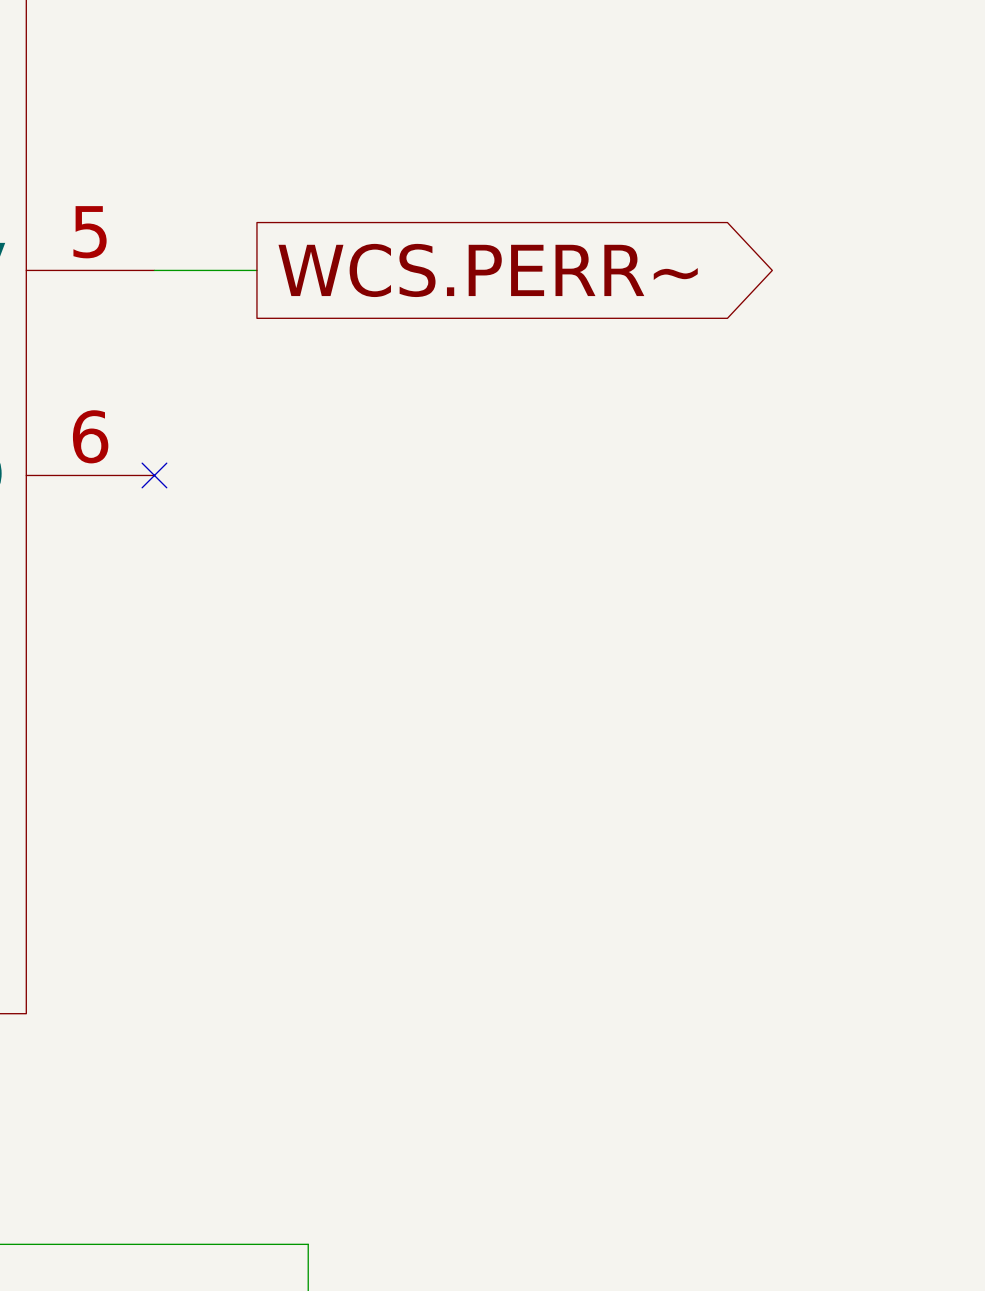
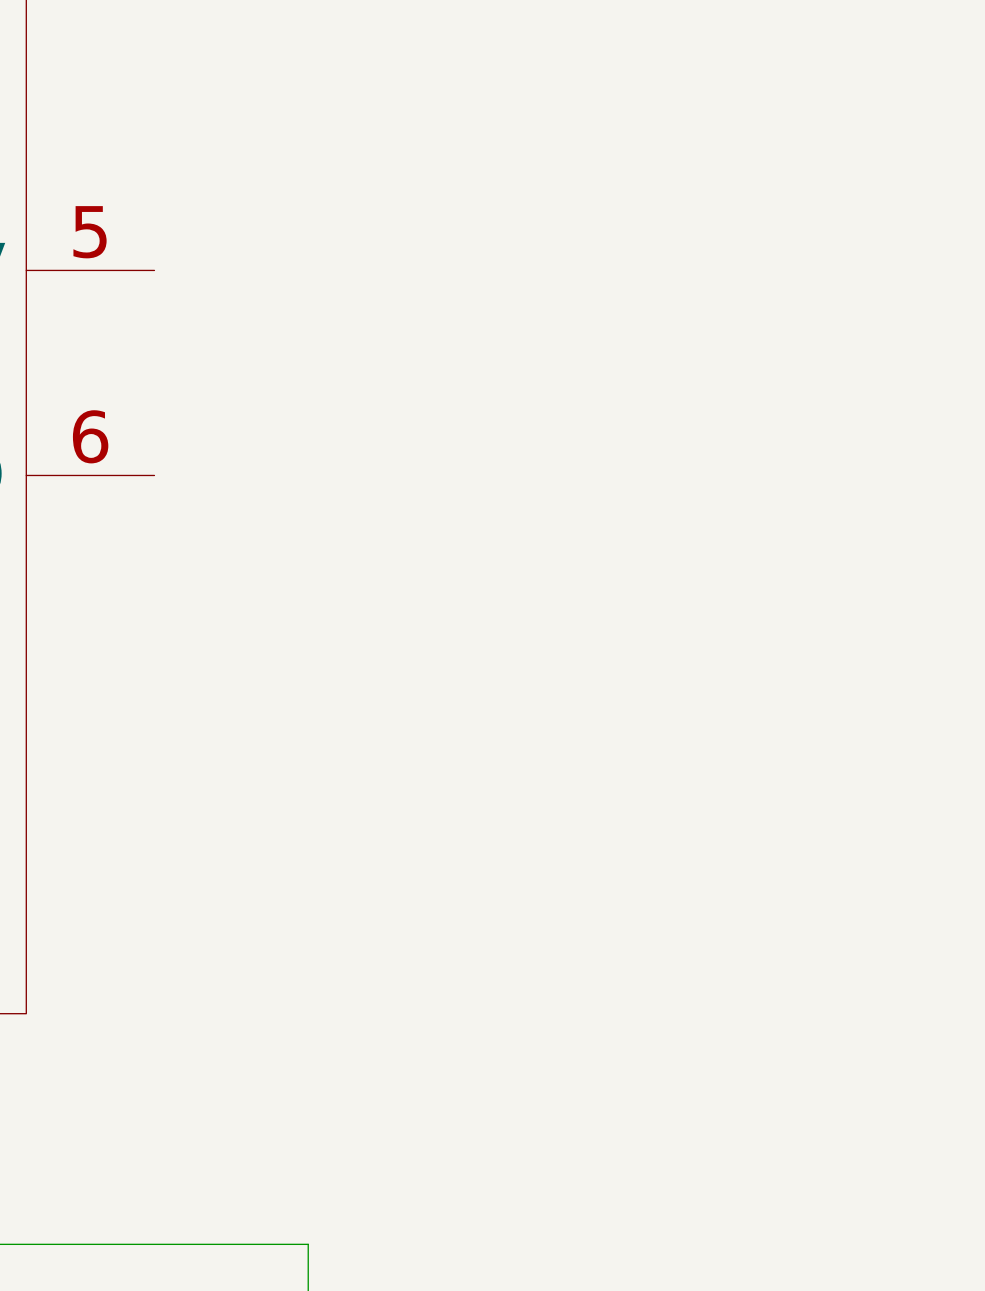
wire: (154, 270) (256, 270) -> none
global label: WCS.PERR~ (488, 270) -> none
no-connect mark: (154, 475) -> none

